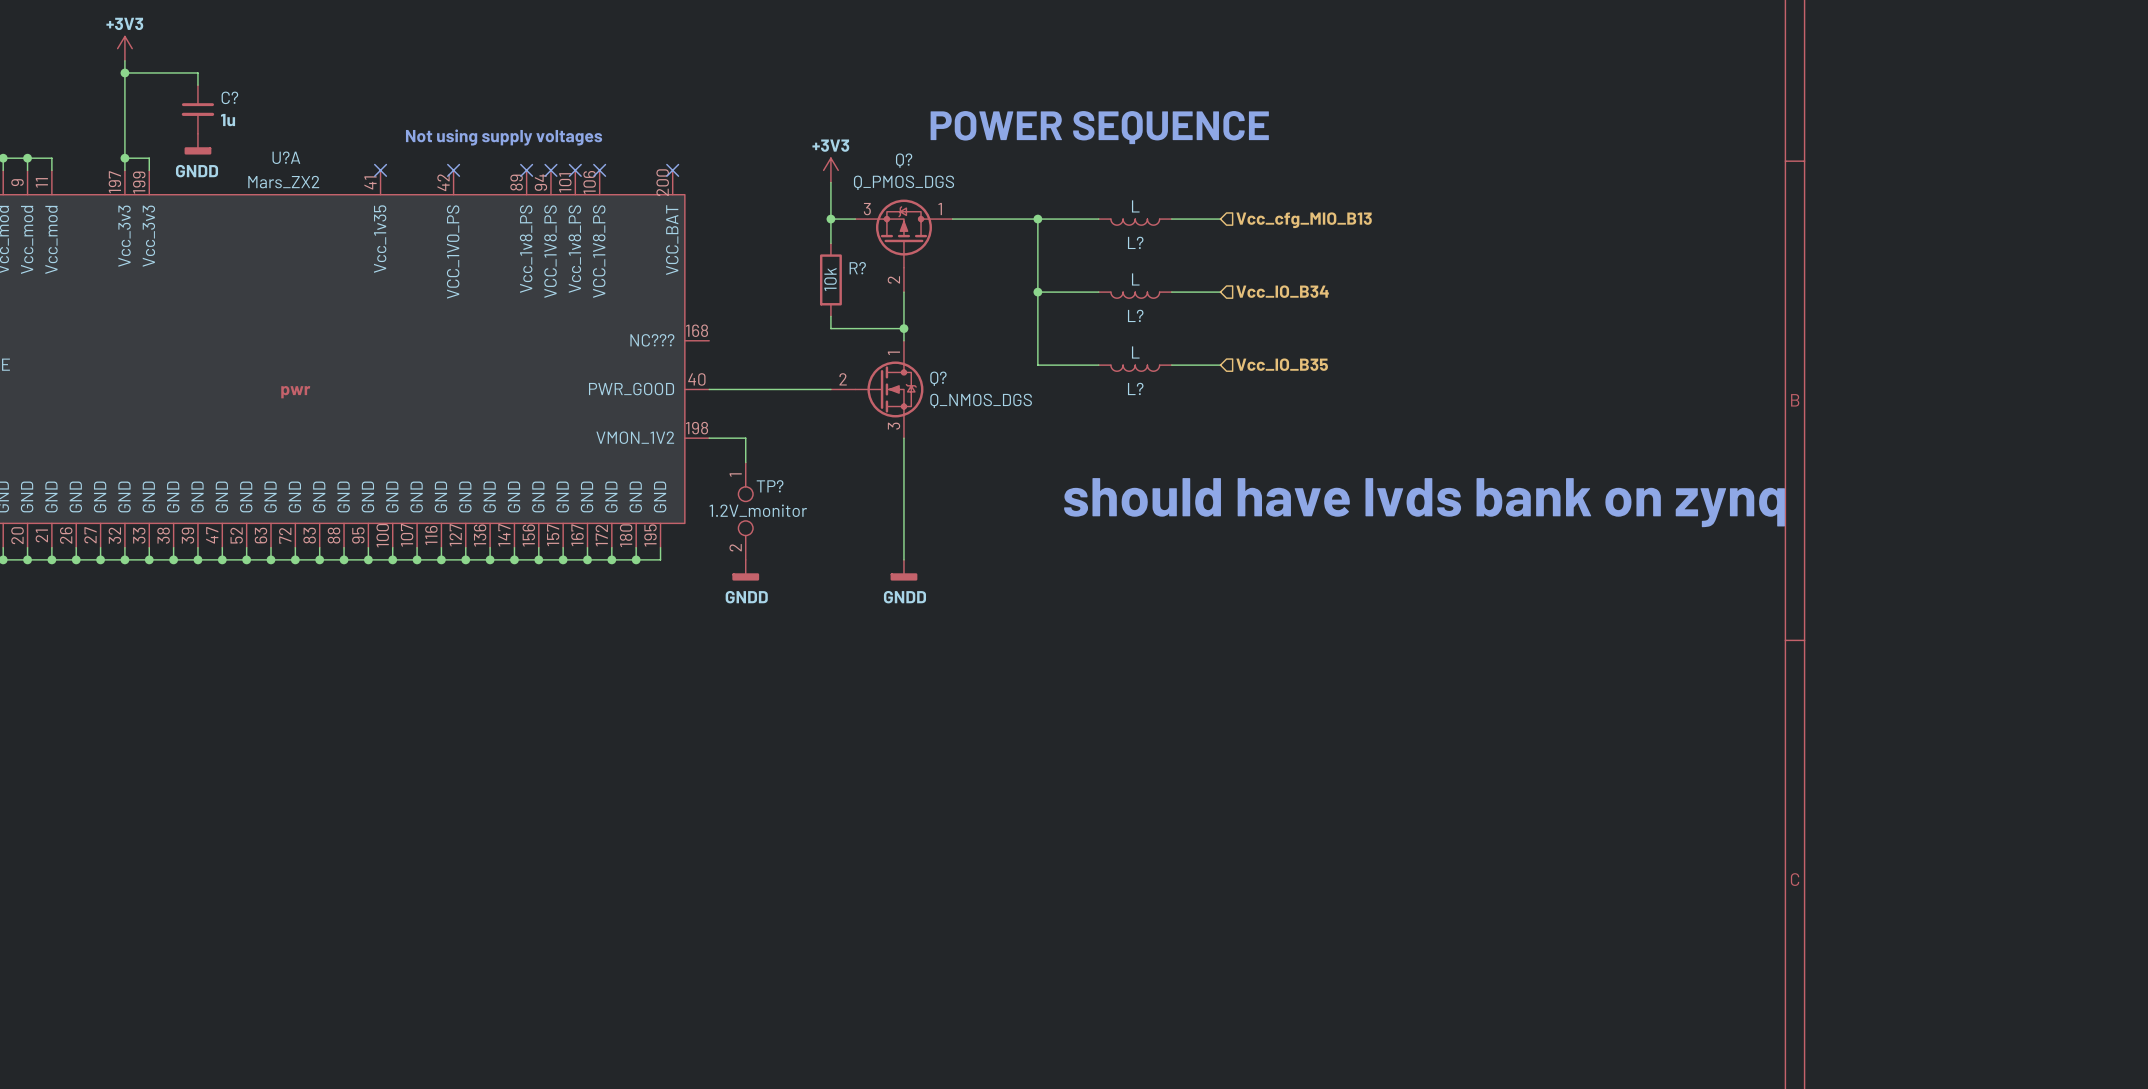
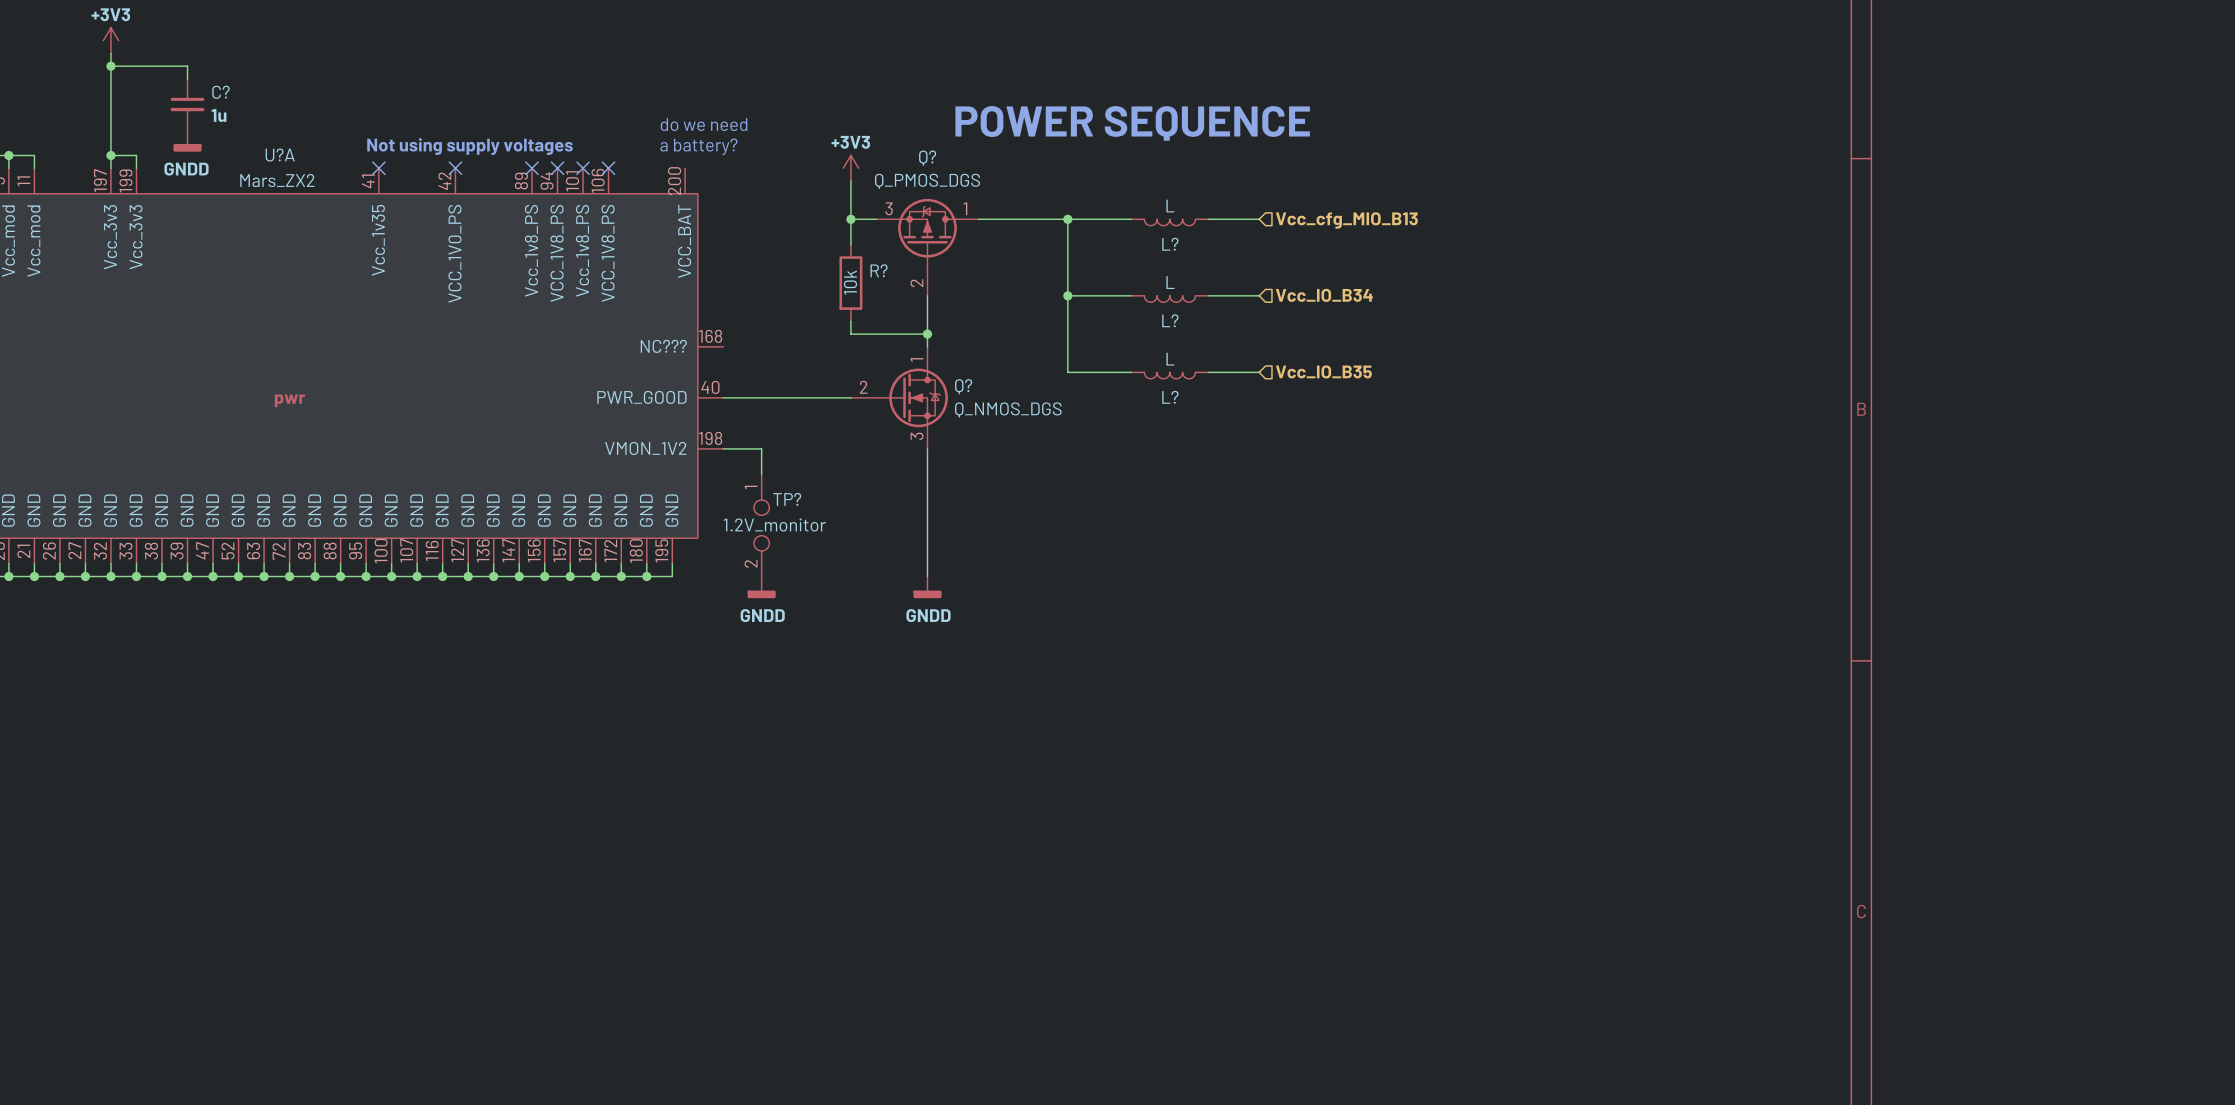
text: none -> do we need (704, 124)
text position: Not using supply voltages (504, 137) -> Not using supply voltages (470, 146)
text: none -> a battery? (698, 146)
no-connect mark: (672, 170) -> none
text: should have lvds bank on zynq (1424, 502) -> none

